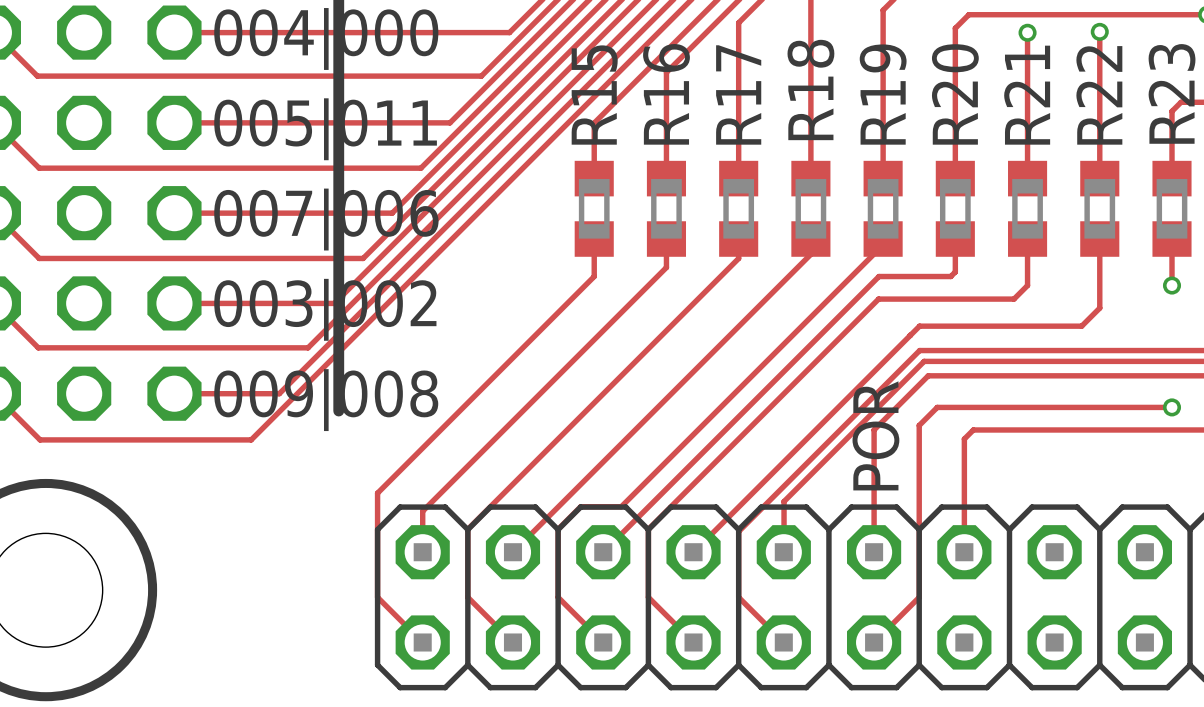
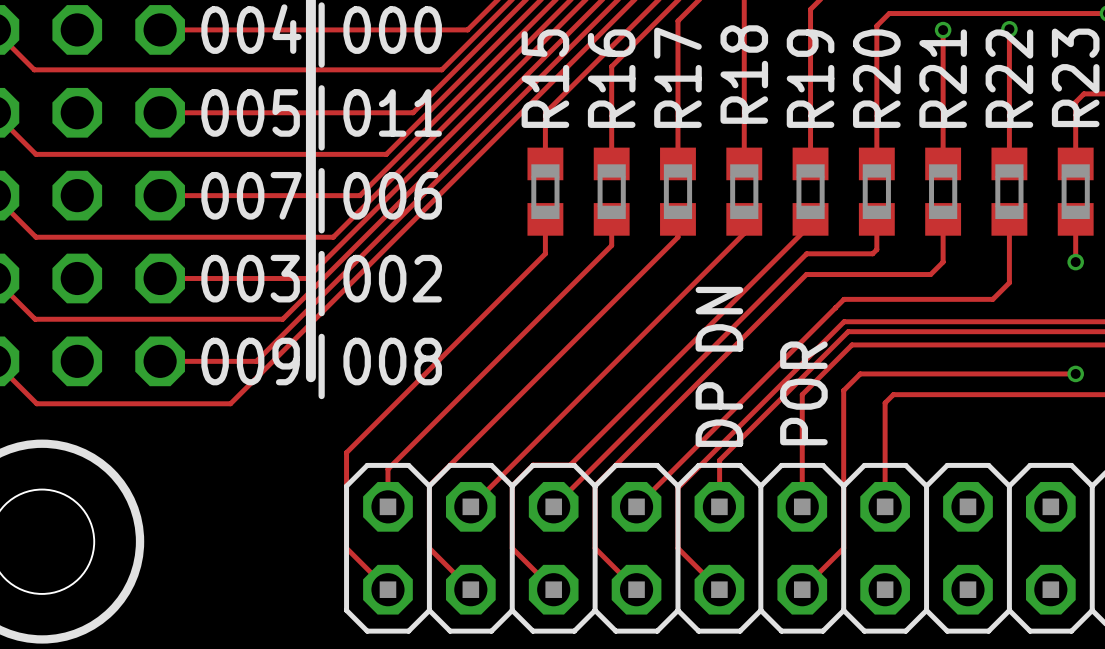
text: none -> DN (719, 319)
text: none -> DP (719, 414)

